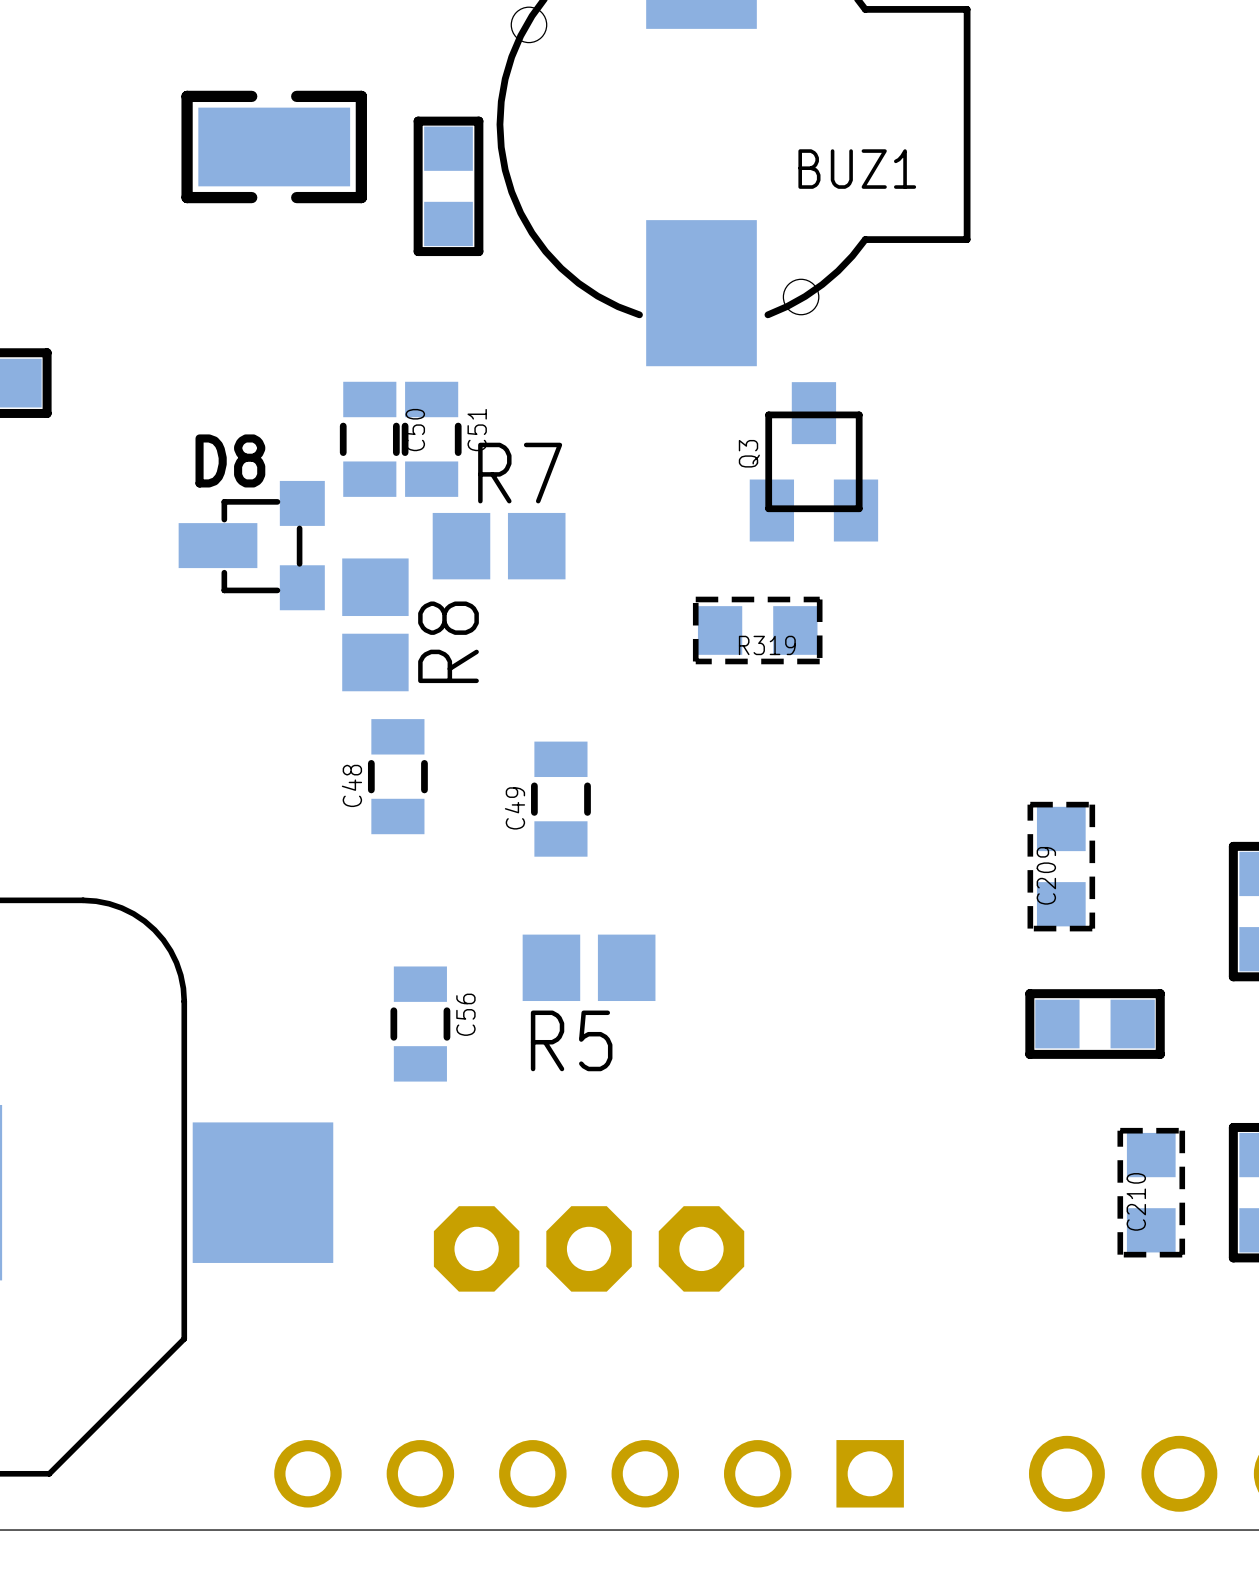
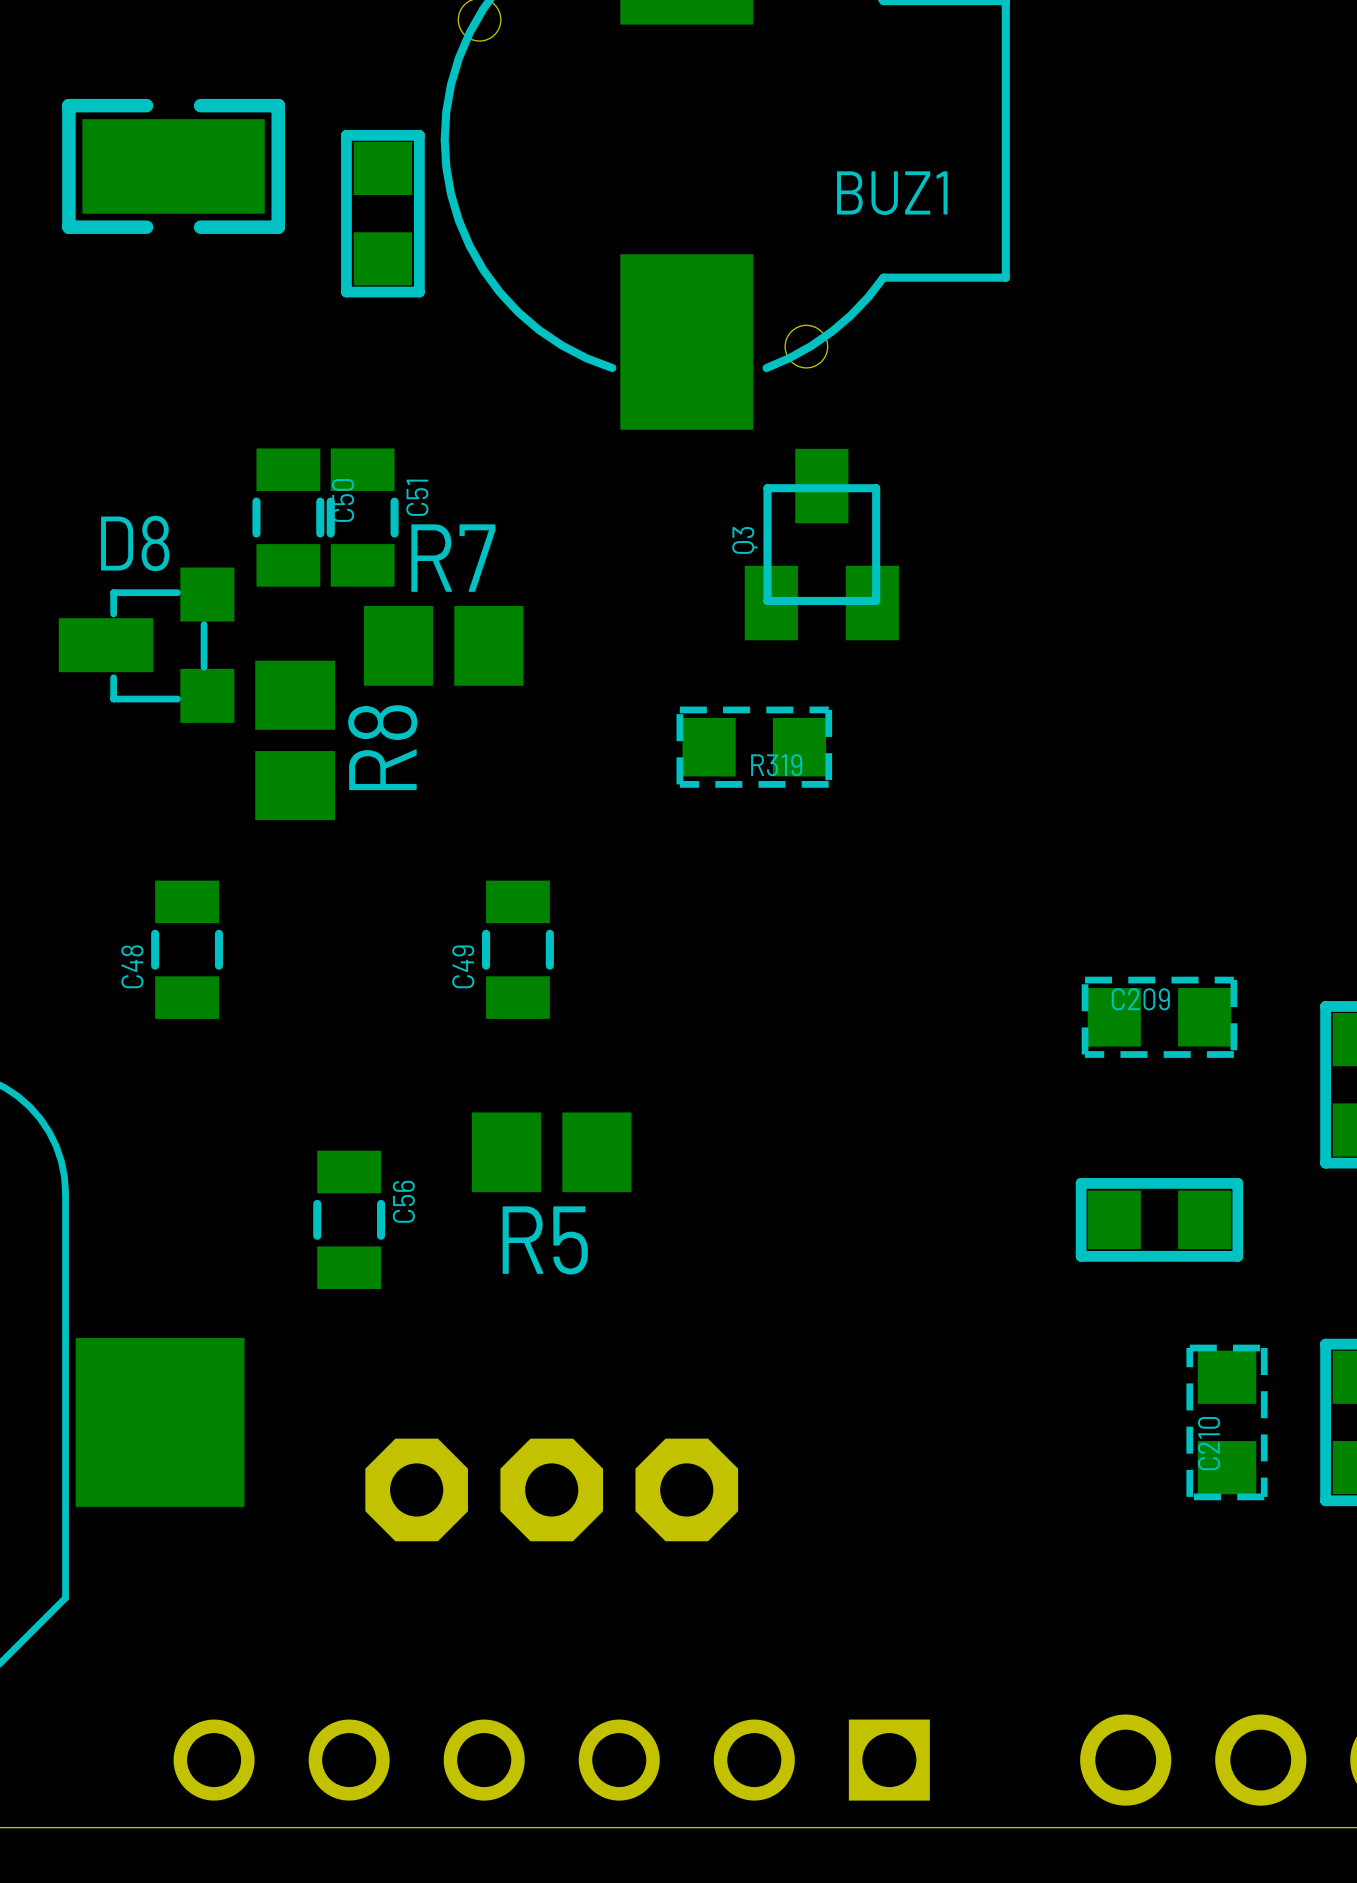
C48 position: (397, 776) -> (187, 949)
C209 rotation: 0° (1061, 866) -> 90° clockwise (1159, 1017)

